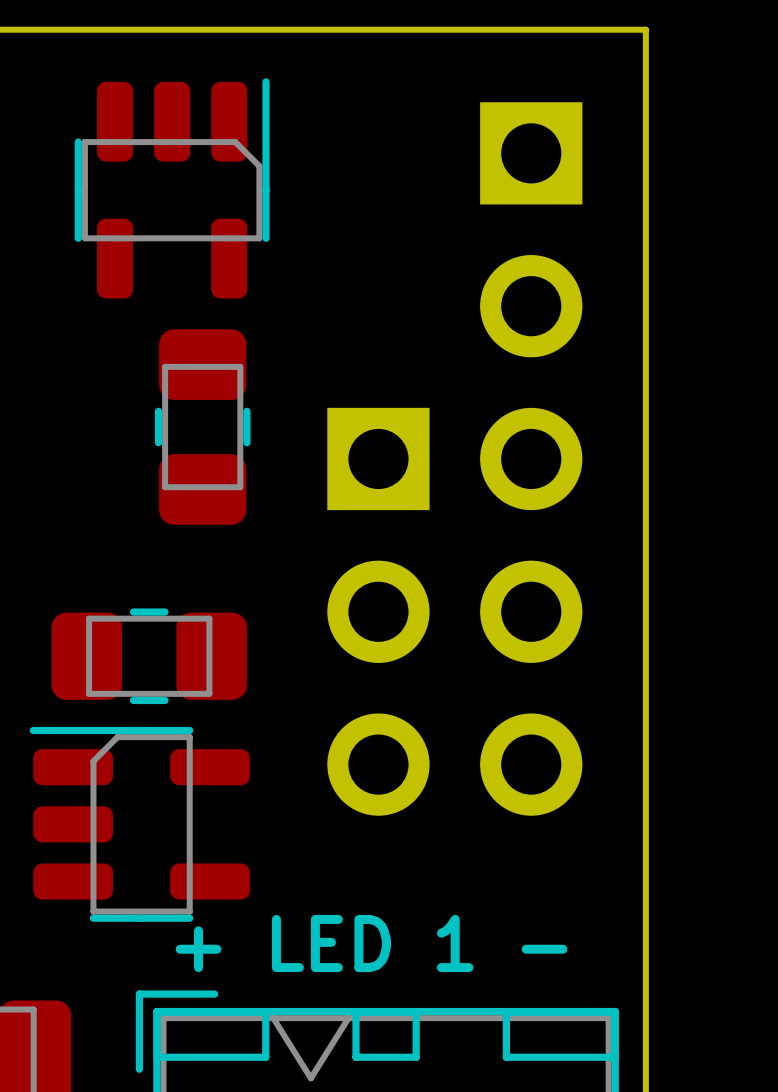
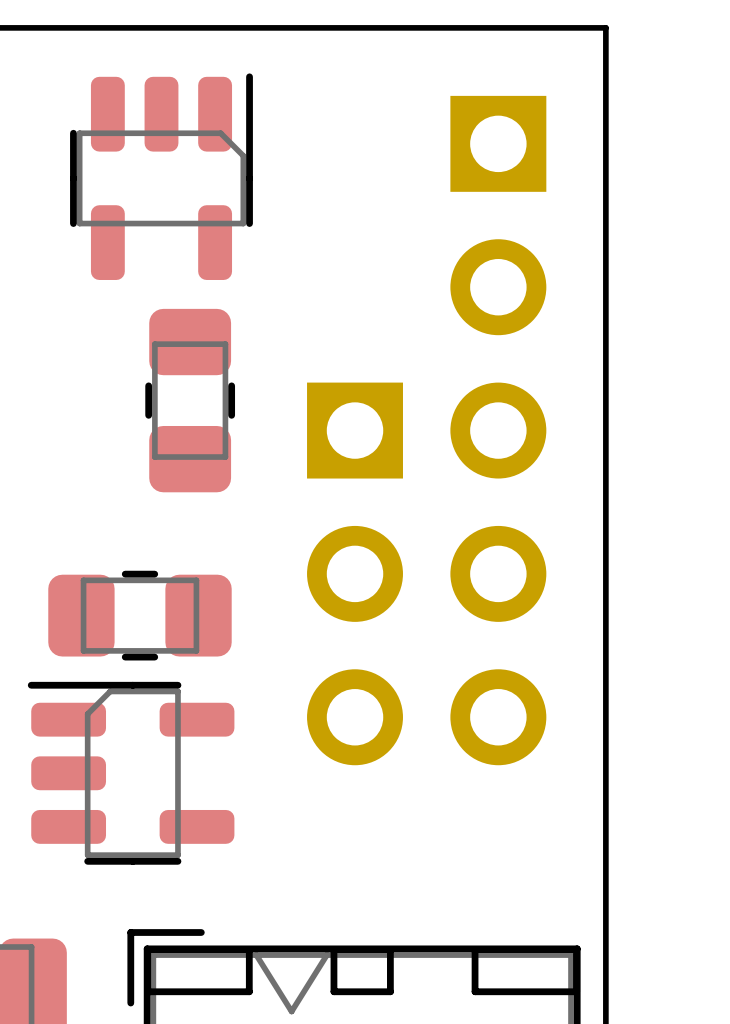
text: + LED 1 - (371, 943) -> none

